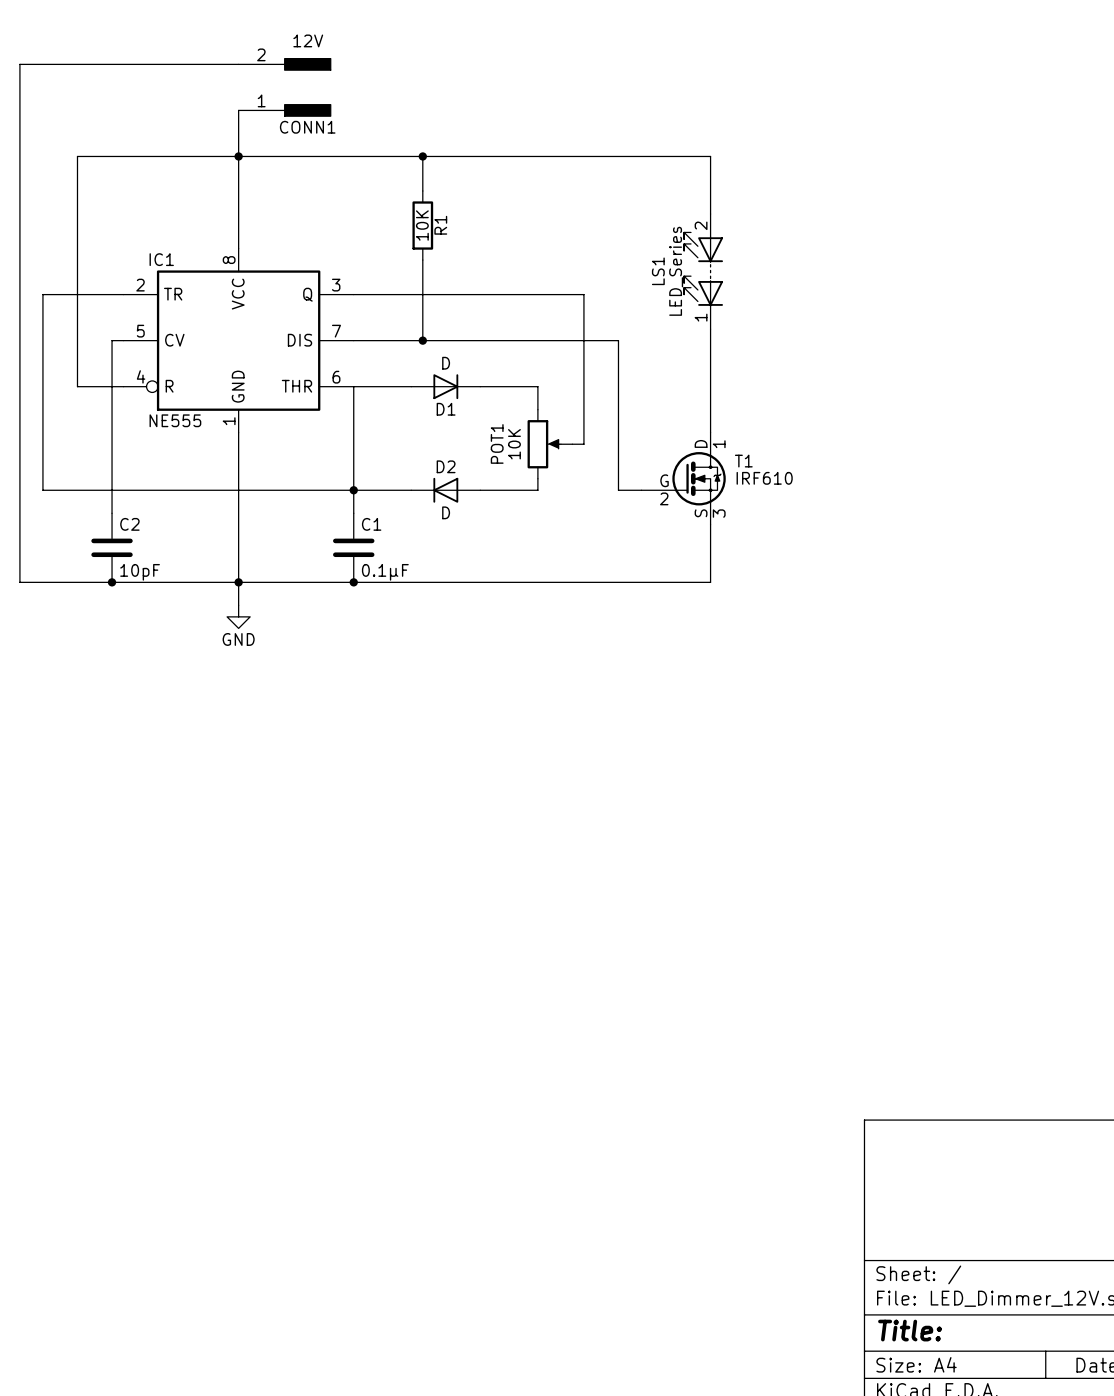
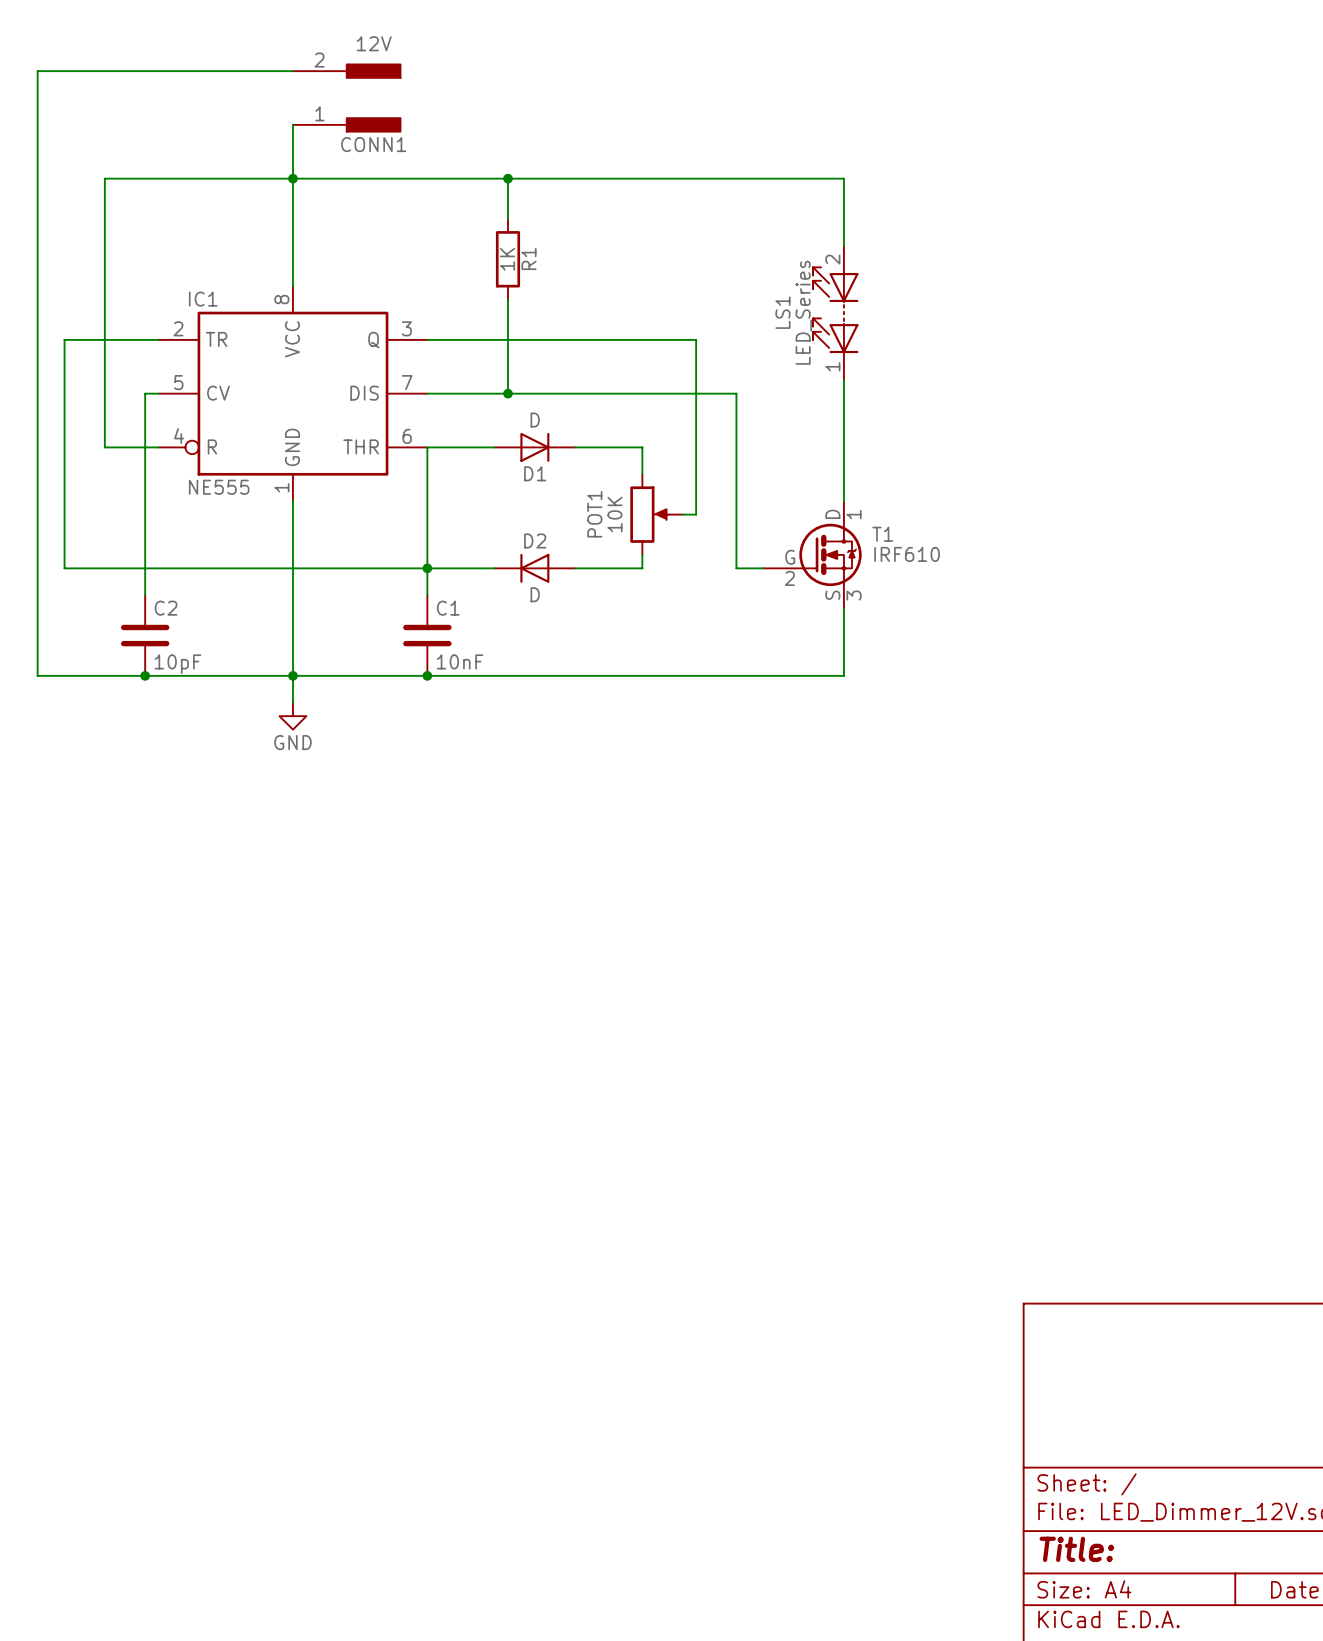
R1 value: 10K (422, 225) -> 1K (507, 259)
C1 value: 0.1µF (385, 572) -> 10nF (460, 661)

